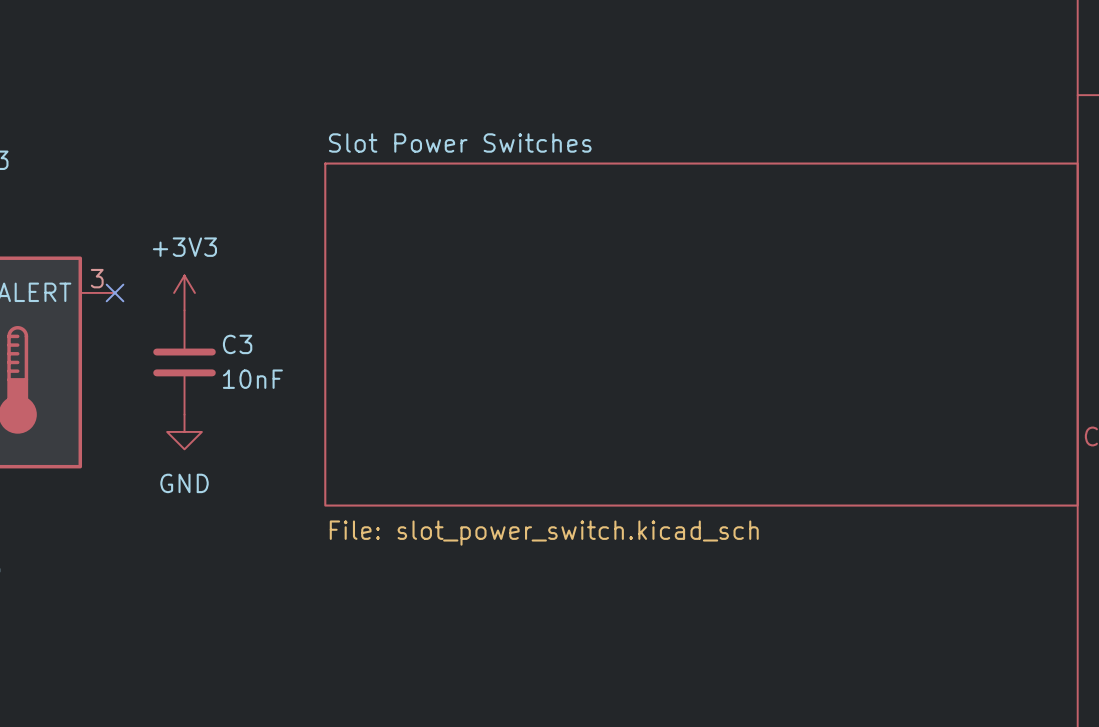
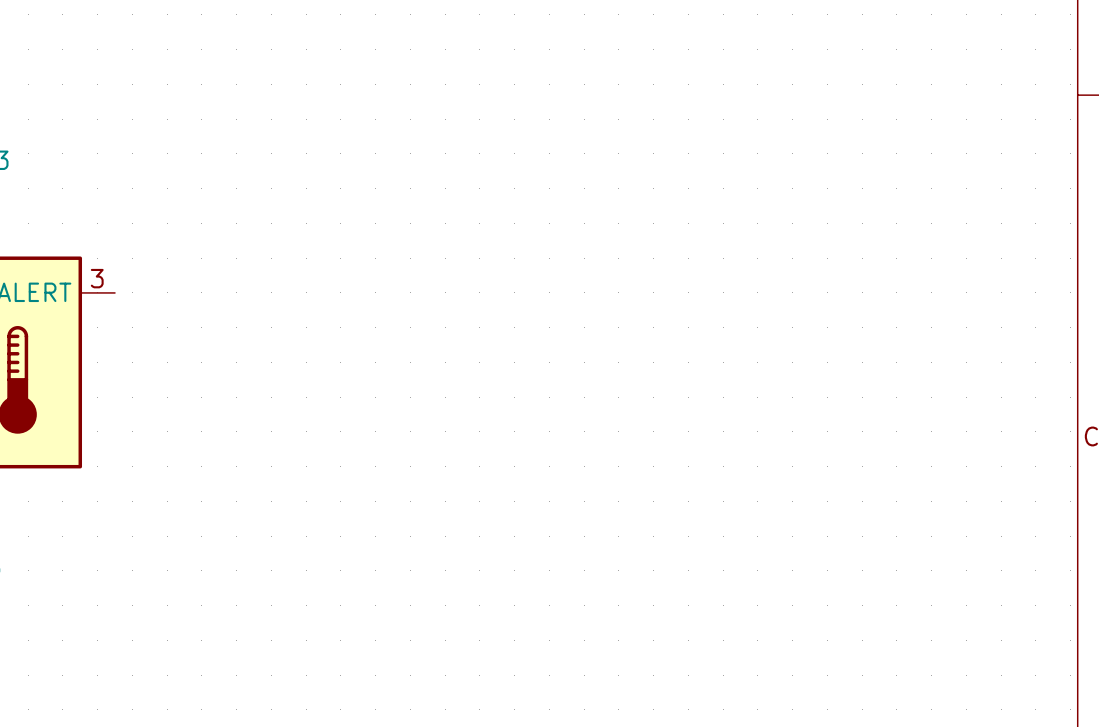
no-connect mark: (115, 292) -> none
power symbol: +3V3 (184, 292) -> none
sheet Slot Power Switches: File: slot_power_switch.kicad_sch (701, 334) -> none
C3: 10nF (184, 362) -> none
power symbol: GND (184, 431) -> none

